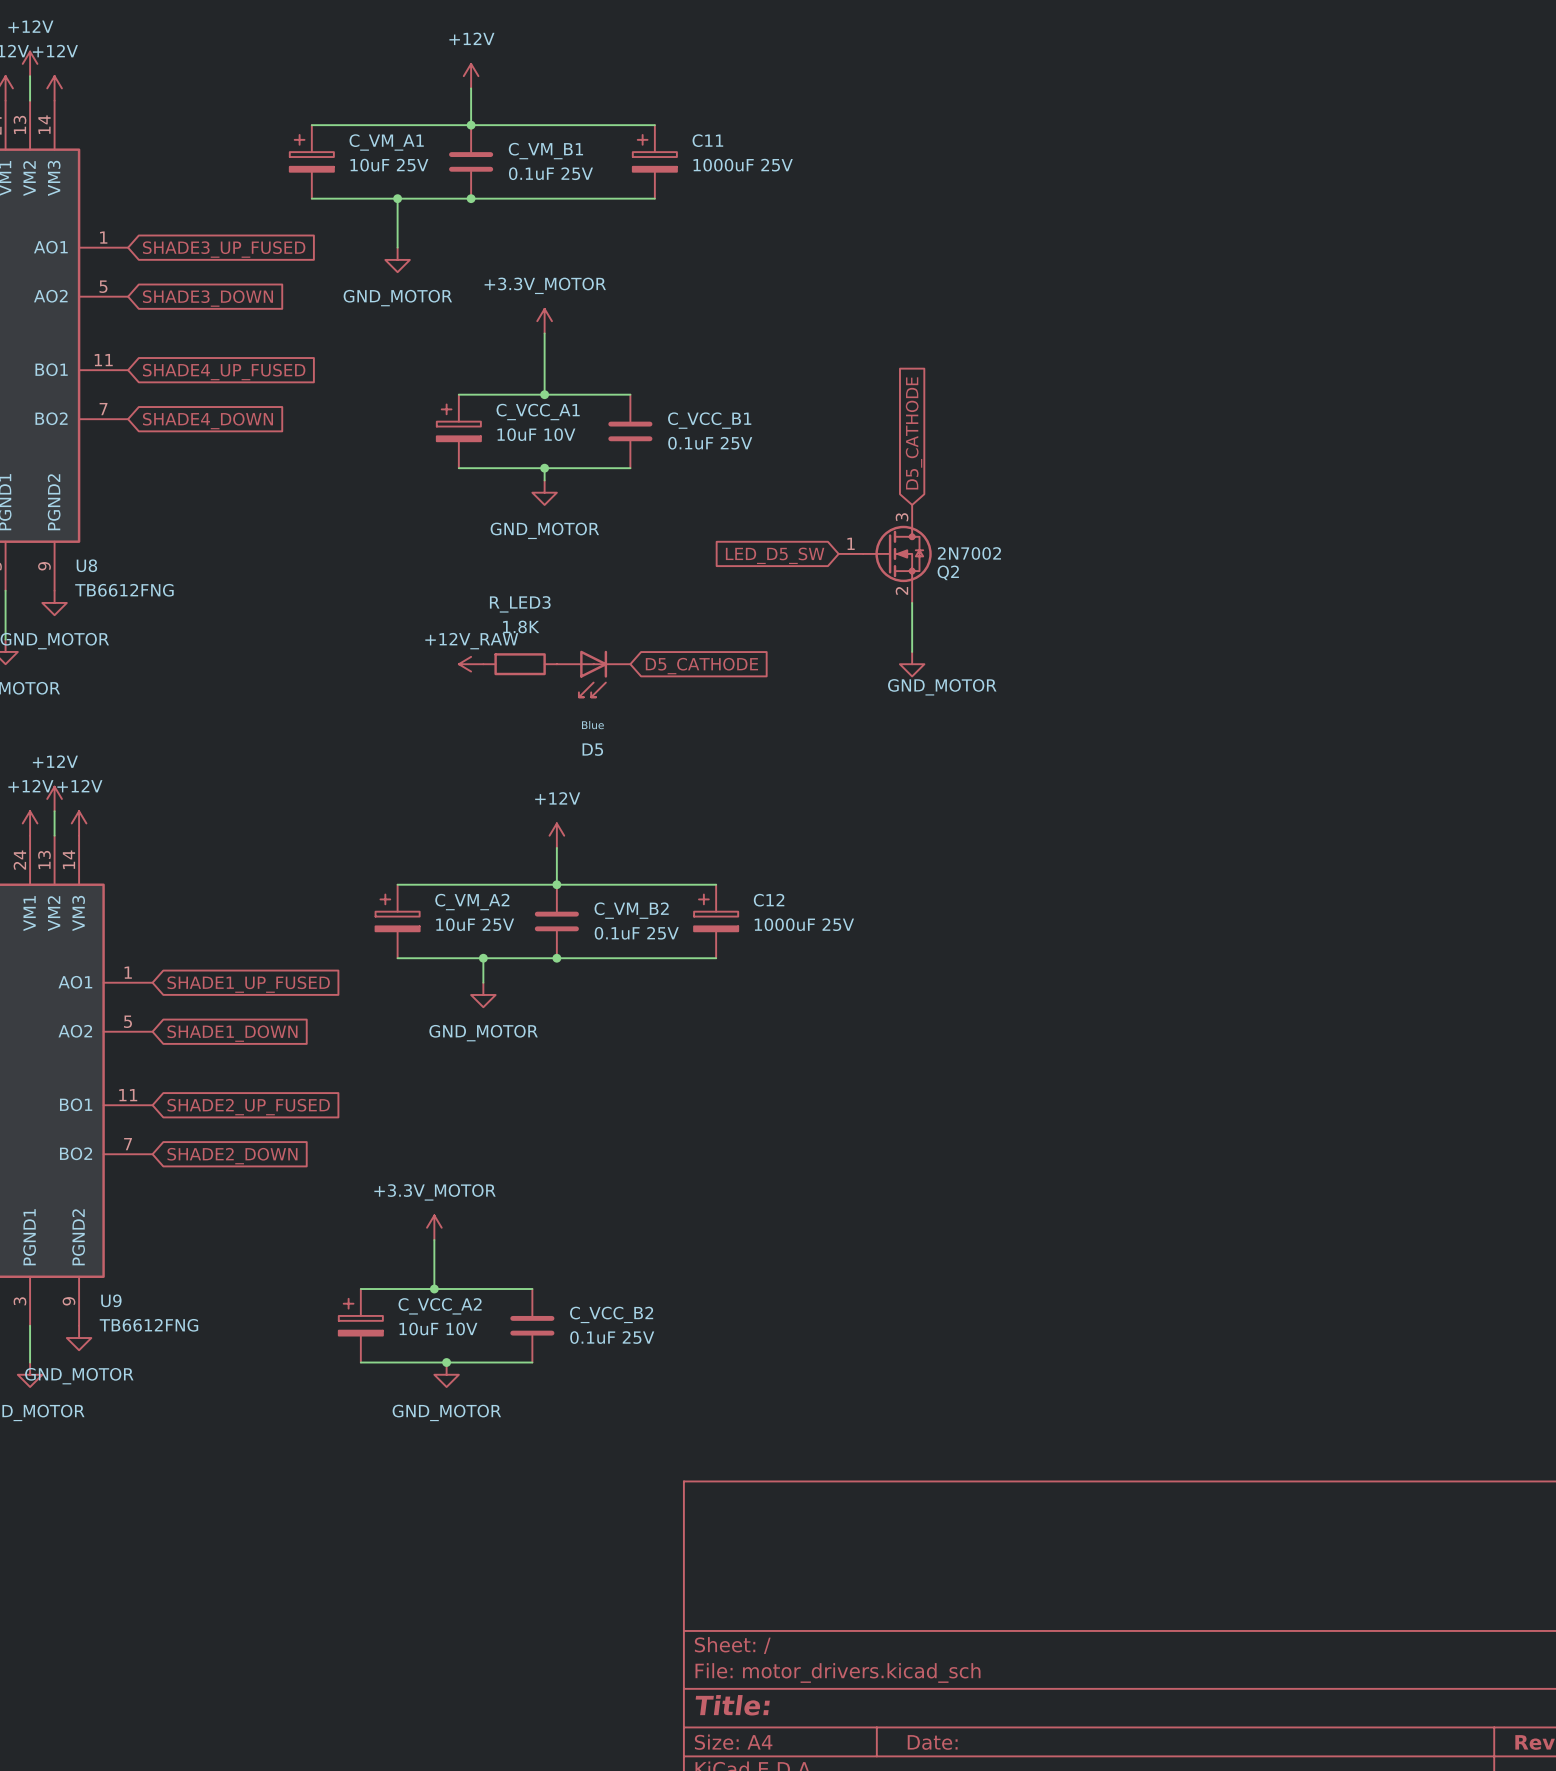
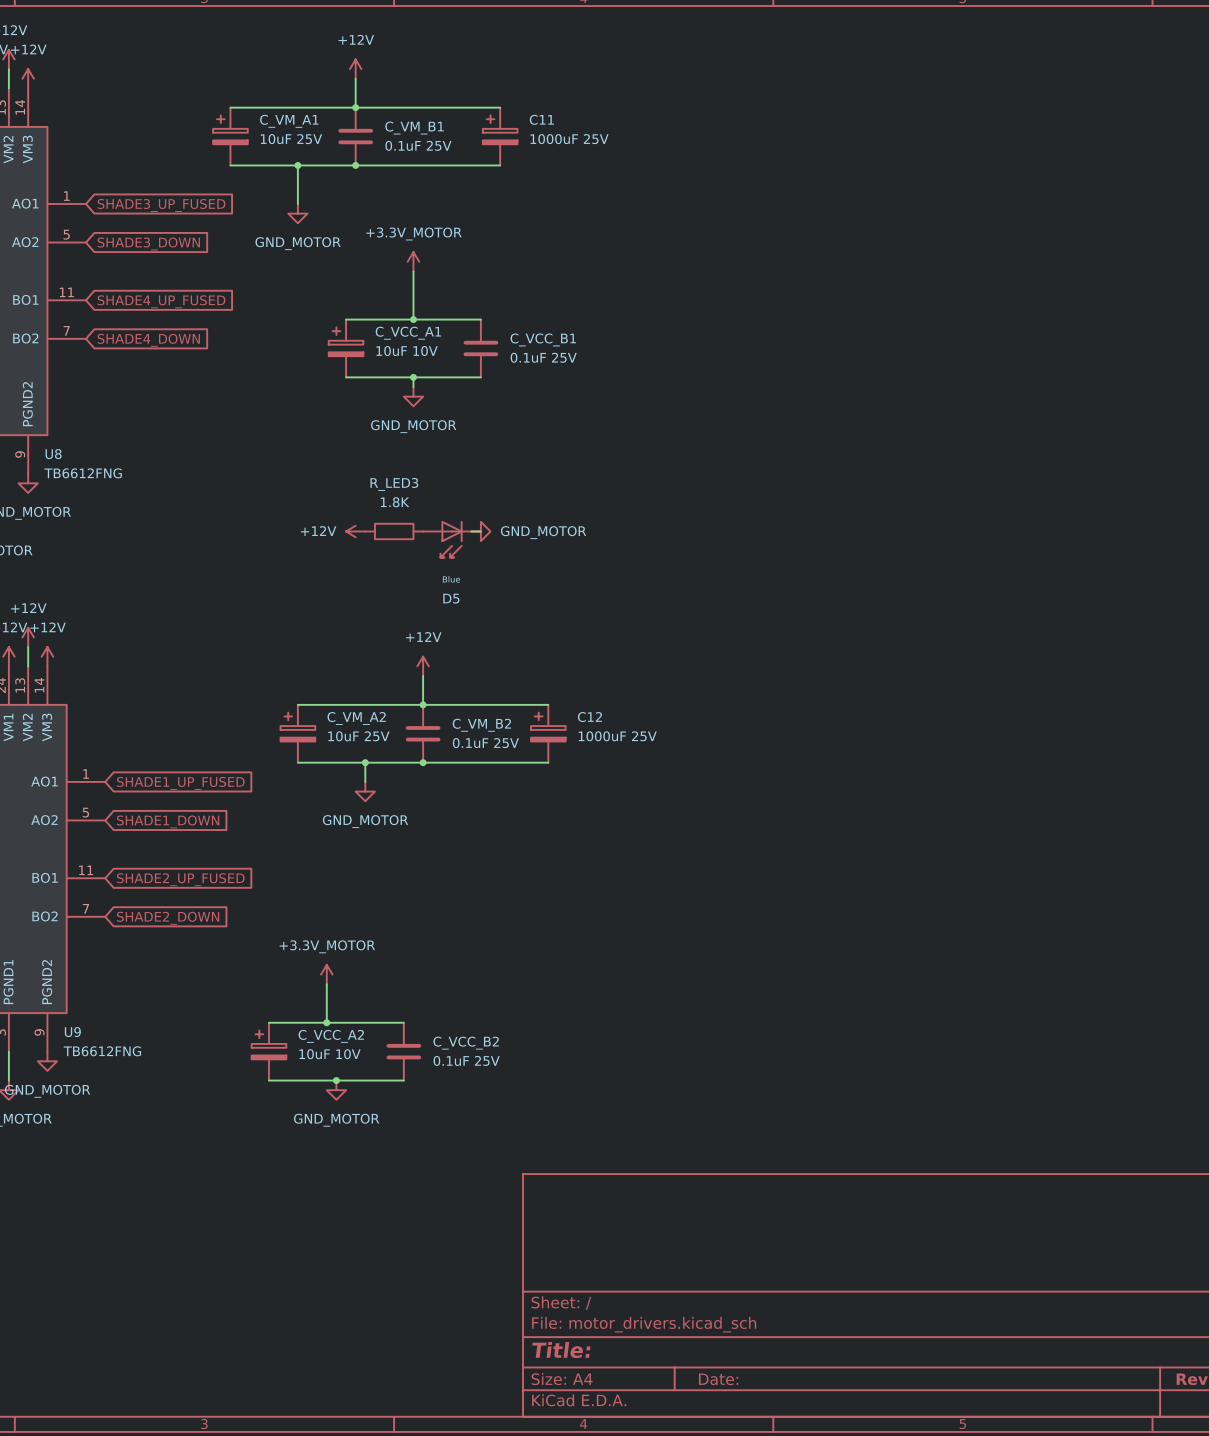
global label: D5_CATHODE (914, 433) -> none
Q2: 2N7002 (885, 553) -> none
global label: LED_D5_SW (775, 555) -> none
wire: (912, 602) (912, 651) -> none
power symbol: +12V_RAW (471, 664) -> +12V (355, 531)
power symbol: none -> GND_MOTOR (480, 531)
power symbol: GND_MOTOR (912, 664) -> none
global label: D5_CATHODE (701, 666) -> none

